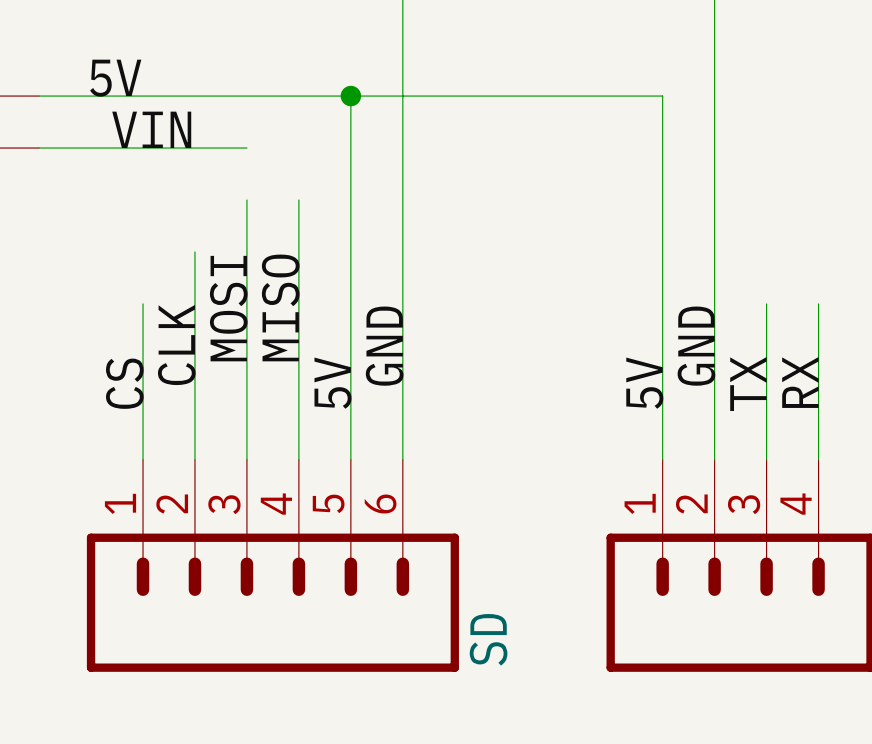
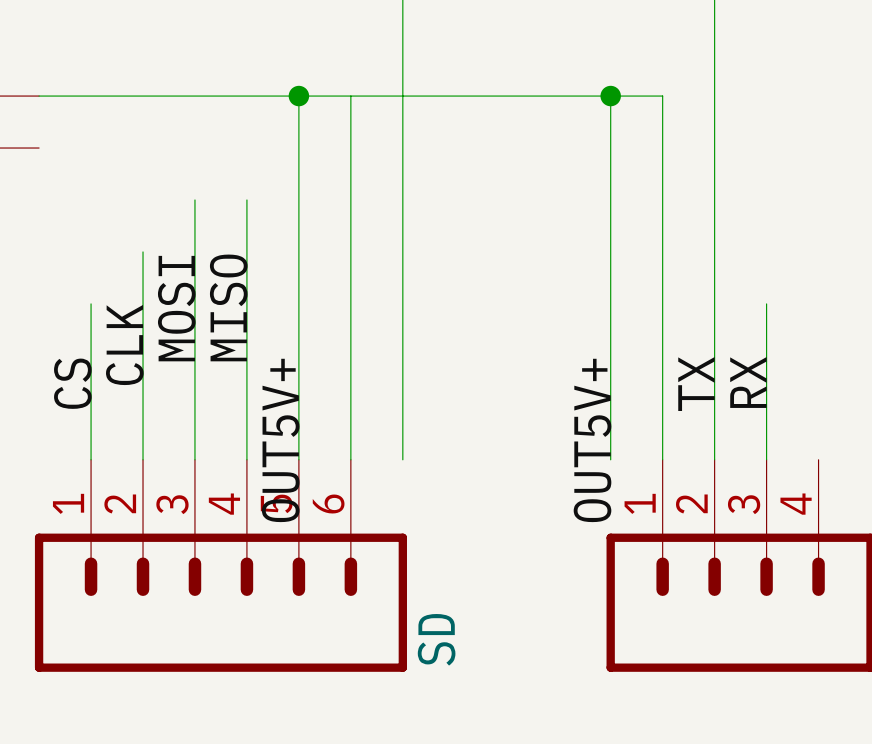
label: 5V (115, 78) -> none
wire: none -> (298, 96) (298, 199)
junction position: (350, 96) -> (298, 96)
wire: none -> (610, 96) (610, 459)
junction: none -> (610, 96)
label: VIN (151, 129) -> none
wire: (39, 148) (246, 148) -> none
wire: none -> (194, 199) (194, 251)
wire: none -> (143, 251) (143, 303)
wire: none -> (91, 303) (91, 459)
wire: (818, 303) (818, 459) -> none
label: MISO (280, 307) -> none
label: none -> MOSI (176, 308)
label: MOSI (228, 308) -> MISO (228, 307)
label position: CLK (176, 345) -> CLK (124, 345)
label: GND (384, 346) -> none
label: GND (696, 346) -> none
label: RX (800, 382) -> none
label position: CS (124, 383) -> CS (72, 383)
label: 5V (332, 383) -> none
label: 5V (644, 383) -> none
label: none -> TX (696, 384)
label: TX (748, 384) -> RX (748, 382)
label: none -> OUT5V+ (280, 440)
label: none -> OUT5V+ (592, 440)
SD position: (272, 565) -> (220, 565)

